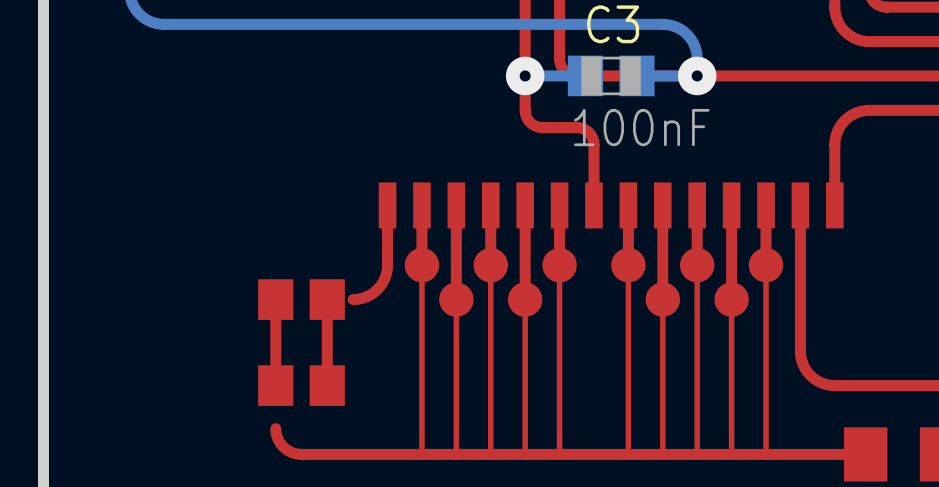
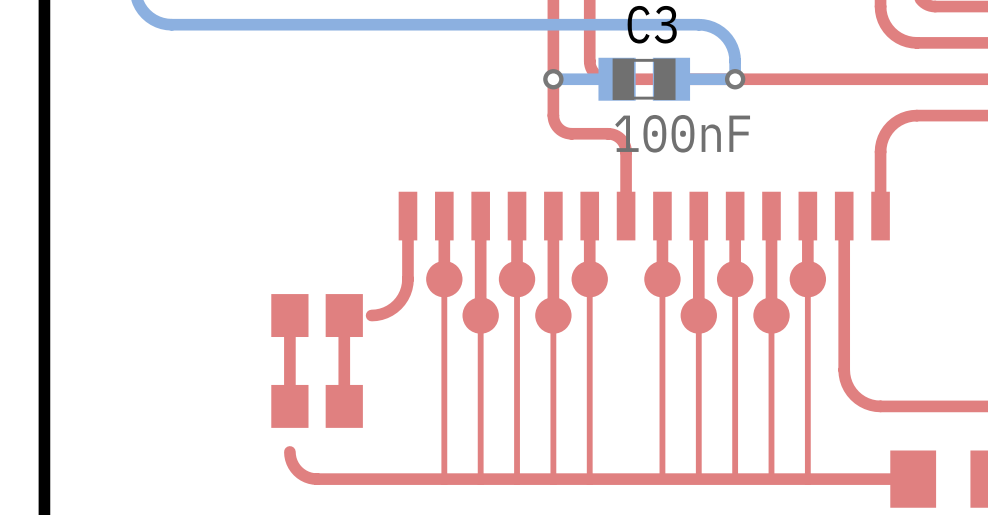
via size: [505, 56, 545, 96] -> [543, 69, 564, 90]
via size: [677, 56, 717, 96] -> [724, 69, 746, 90]

